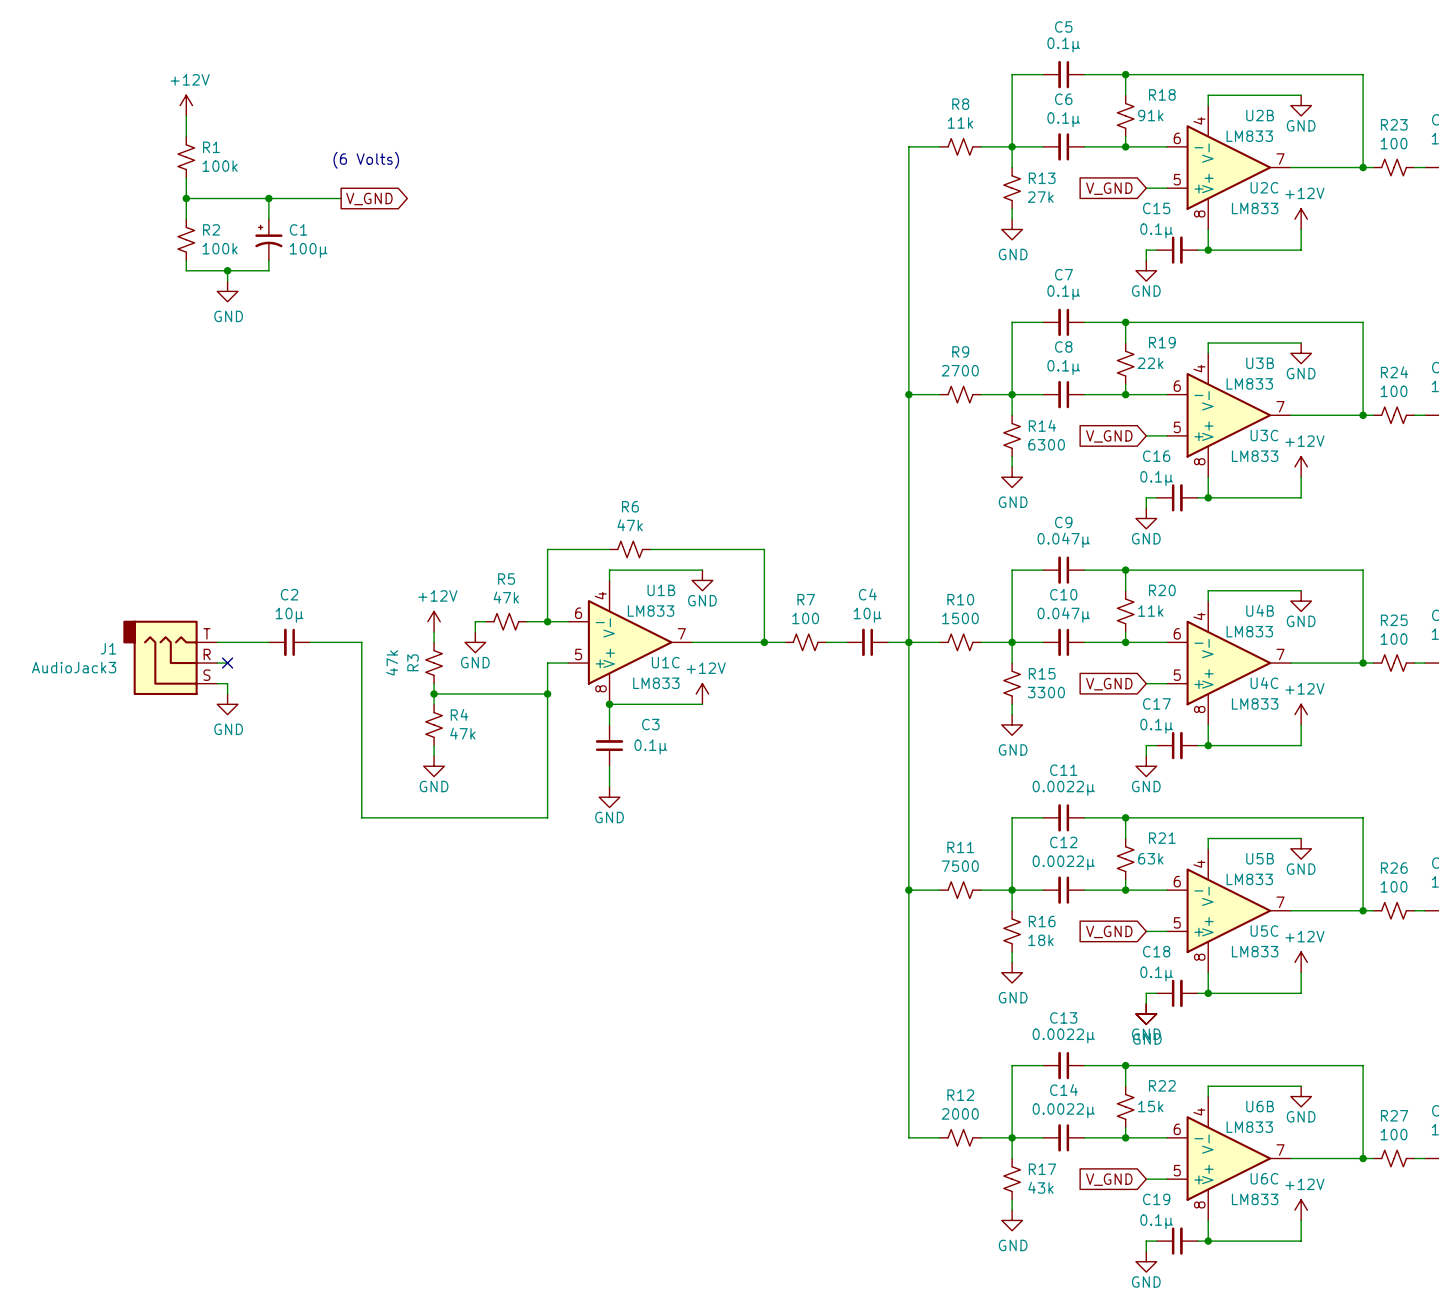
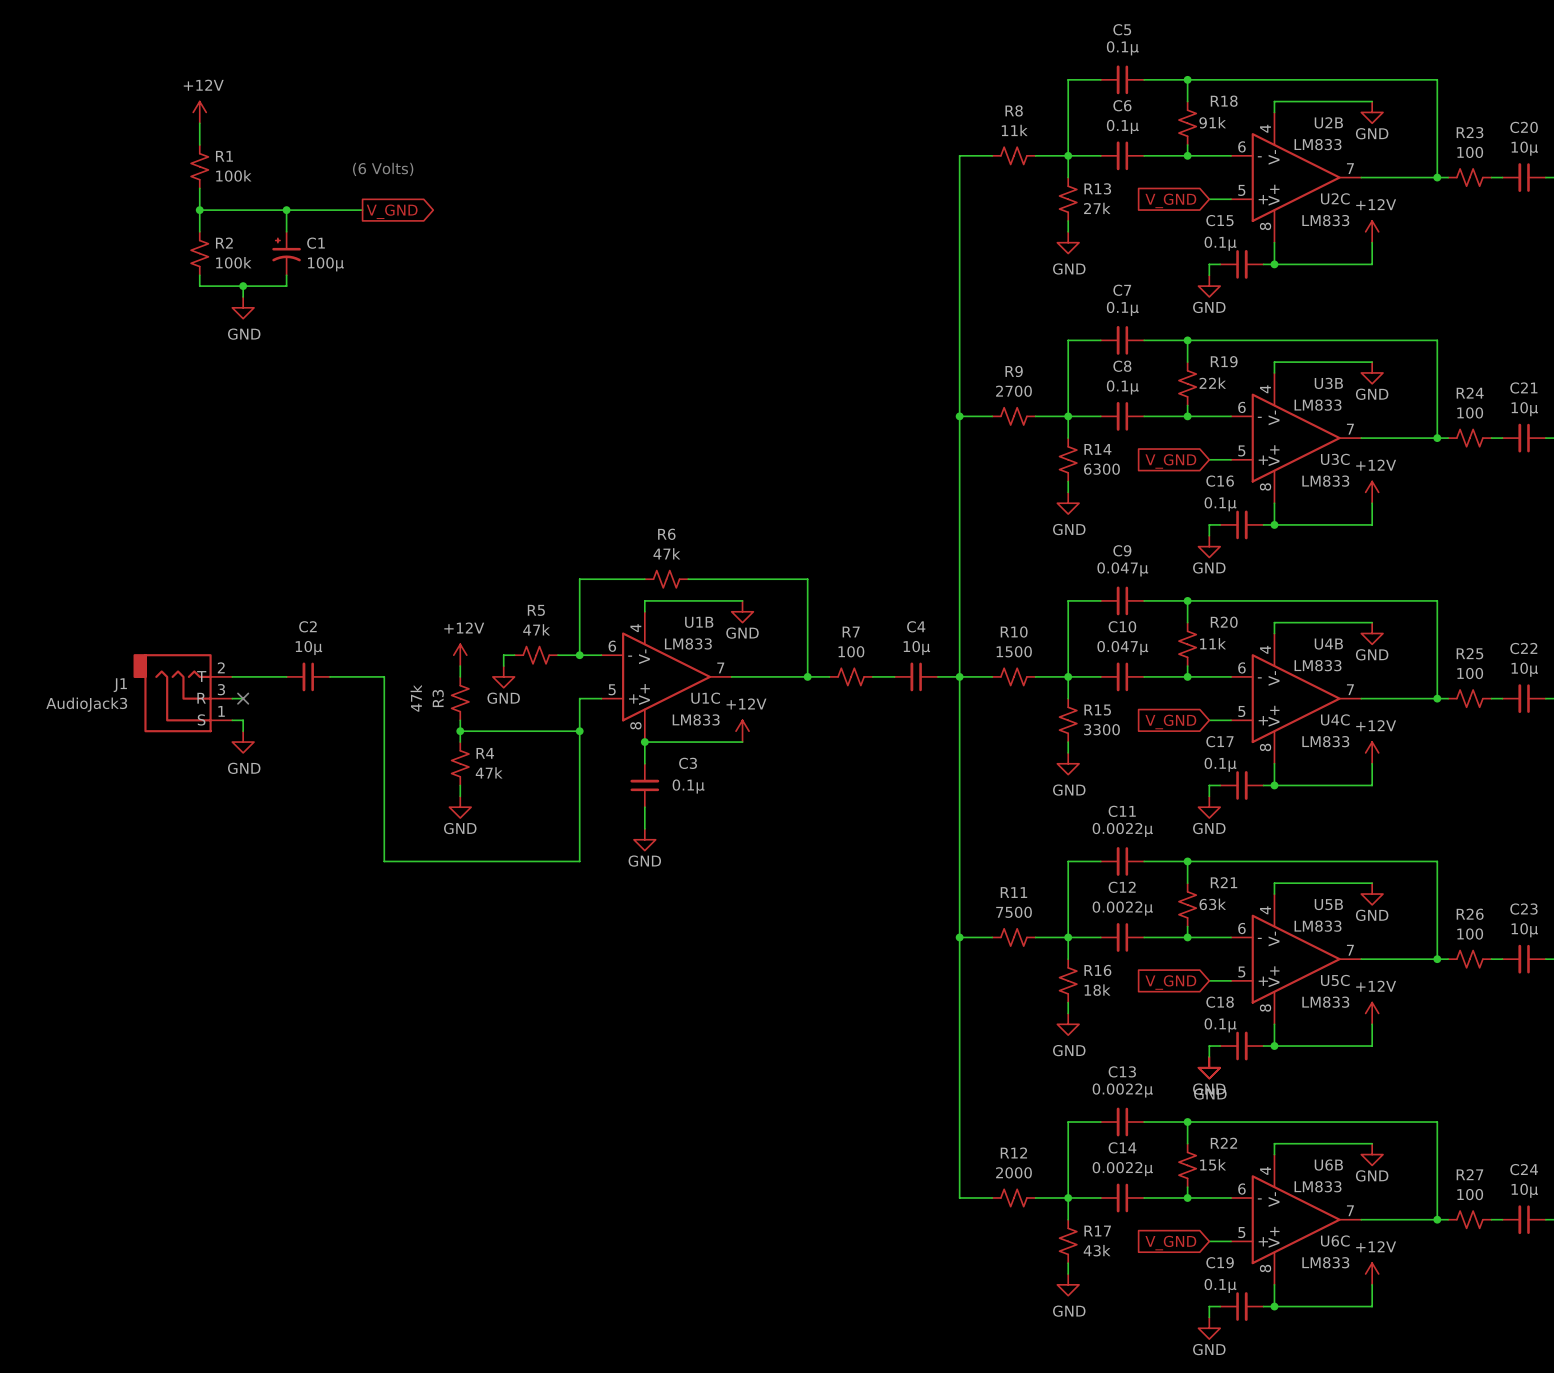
J1 pin number: T (206, 633) -> 2 (221, 667)
J1 pin name: none -> T (201, 676)
J1 pin number: R (207, 654) -> 3 (221, 689)
J1 pin name: none -> R (201, 698)
J1 pin number: S (206, 675) -> 1 (221, 711)
J1 pin name: none -> S (201, 719)

